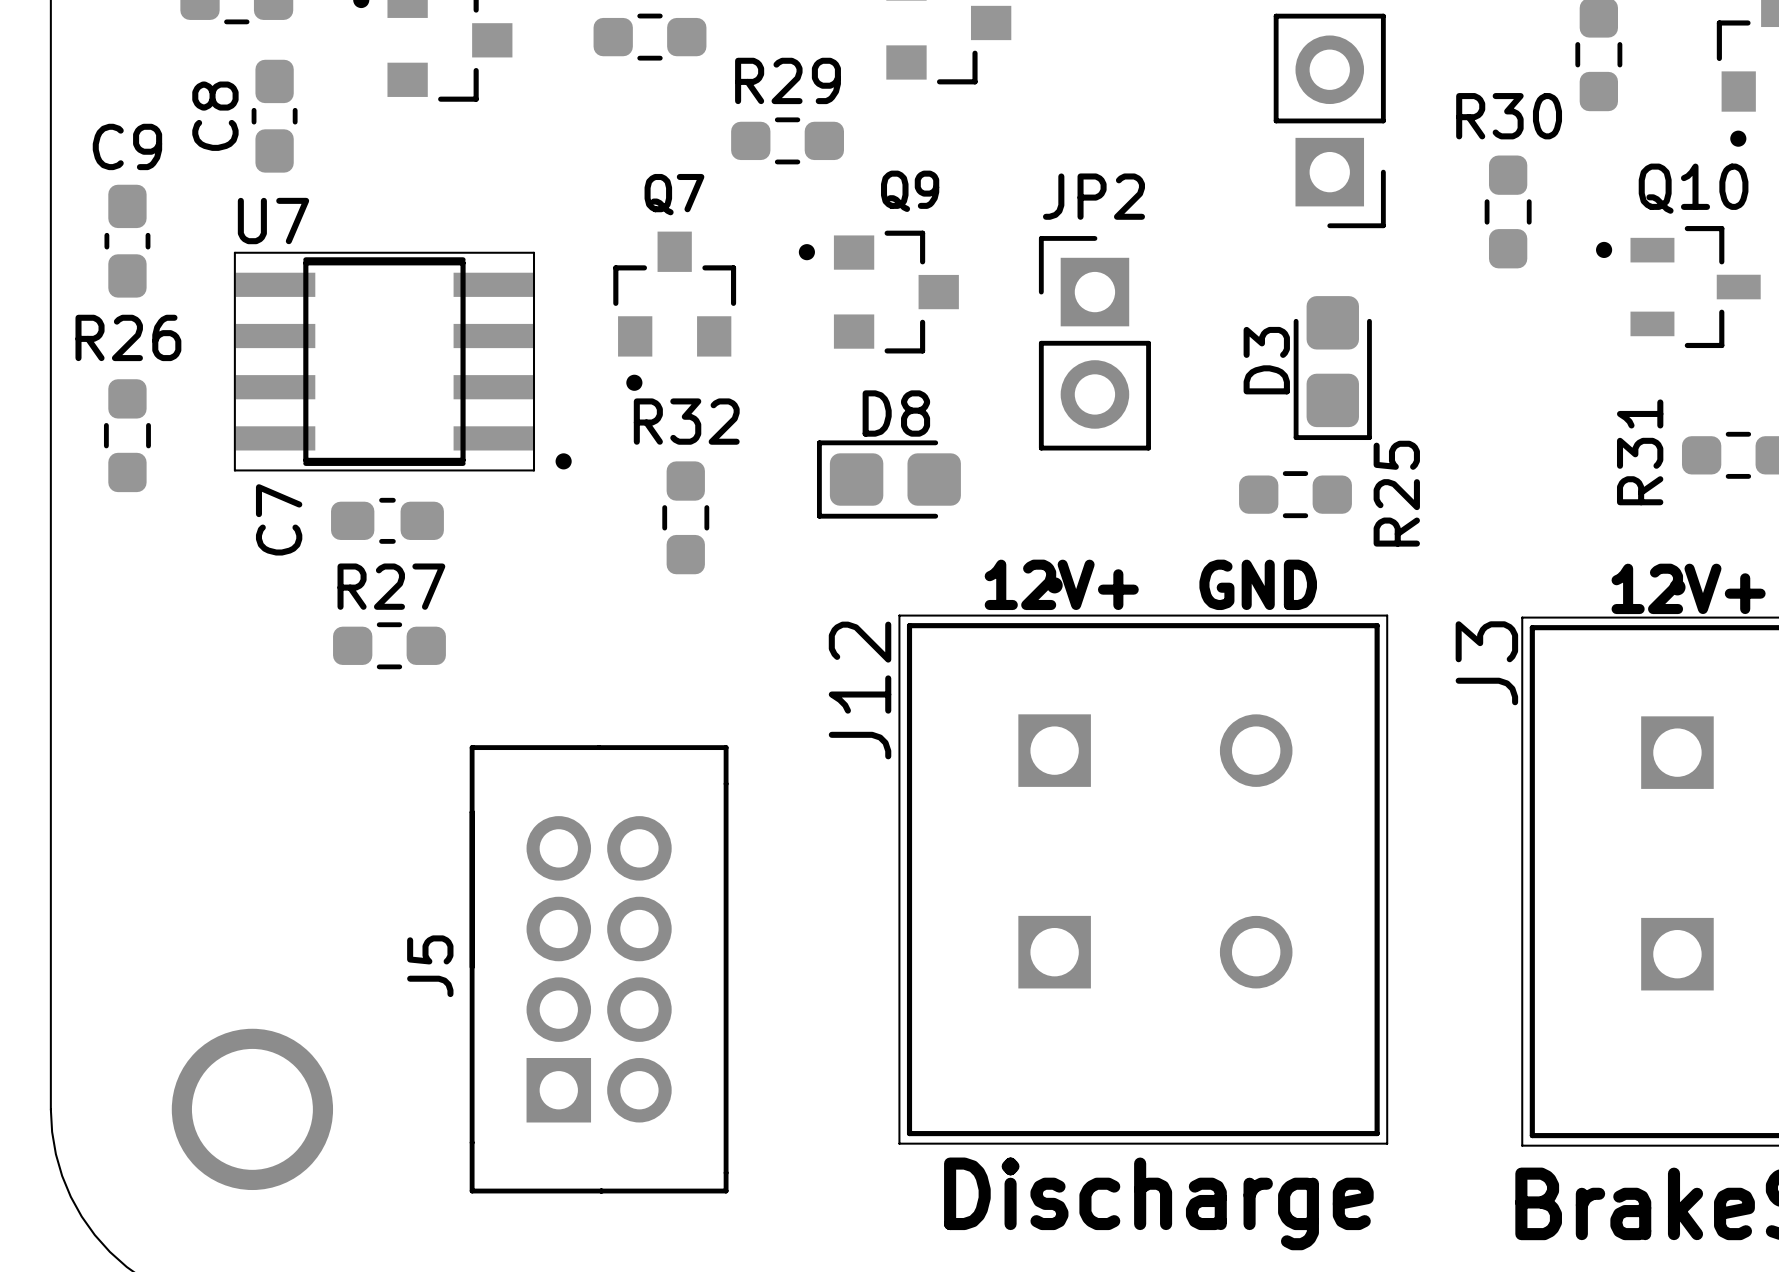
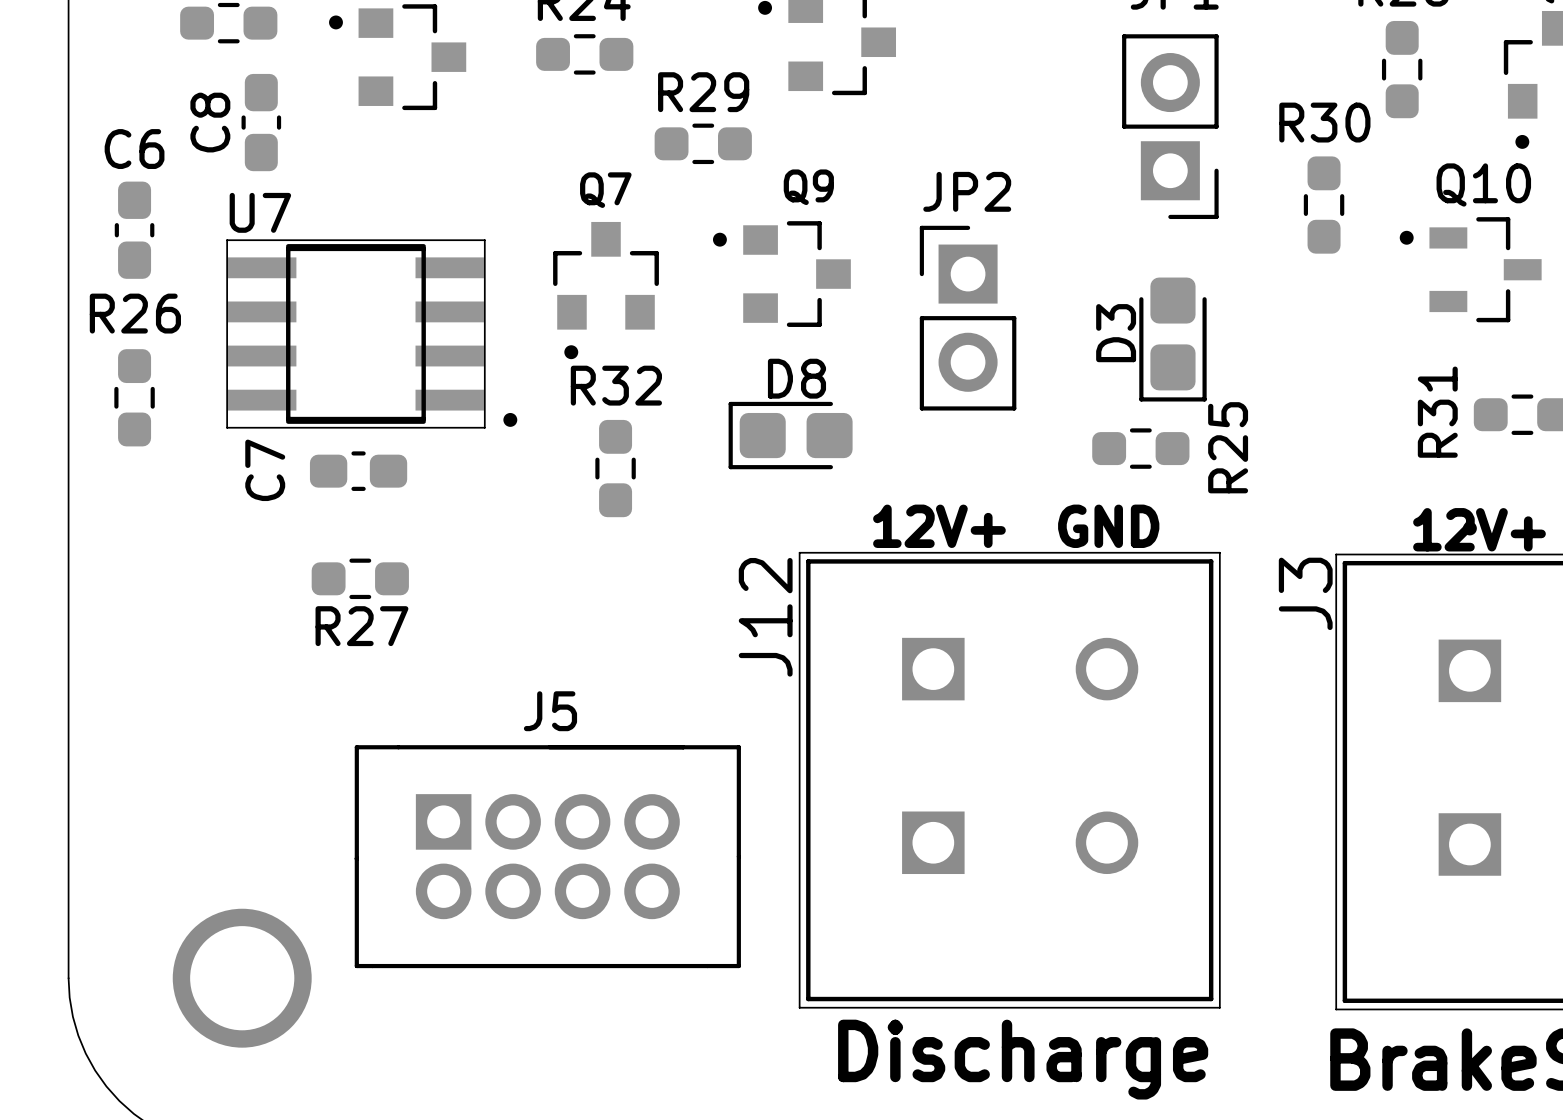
C9 name: C9 (127, 146) -> C6 (134, 149)
J12 footprint: [898, 577, 1389, 1145] -> [798, 551, 1221, 1009]
R27 name position: R27 (391, 586) -> R27 (361, 626)
J5 rotation: 0° (599, 969) -> 90° clockwise (547, 856)

